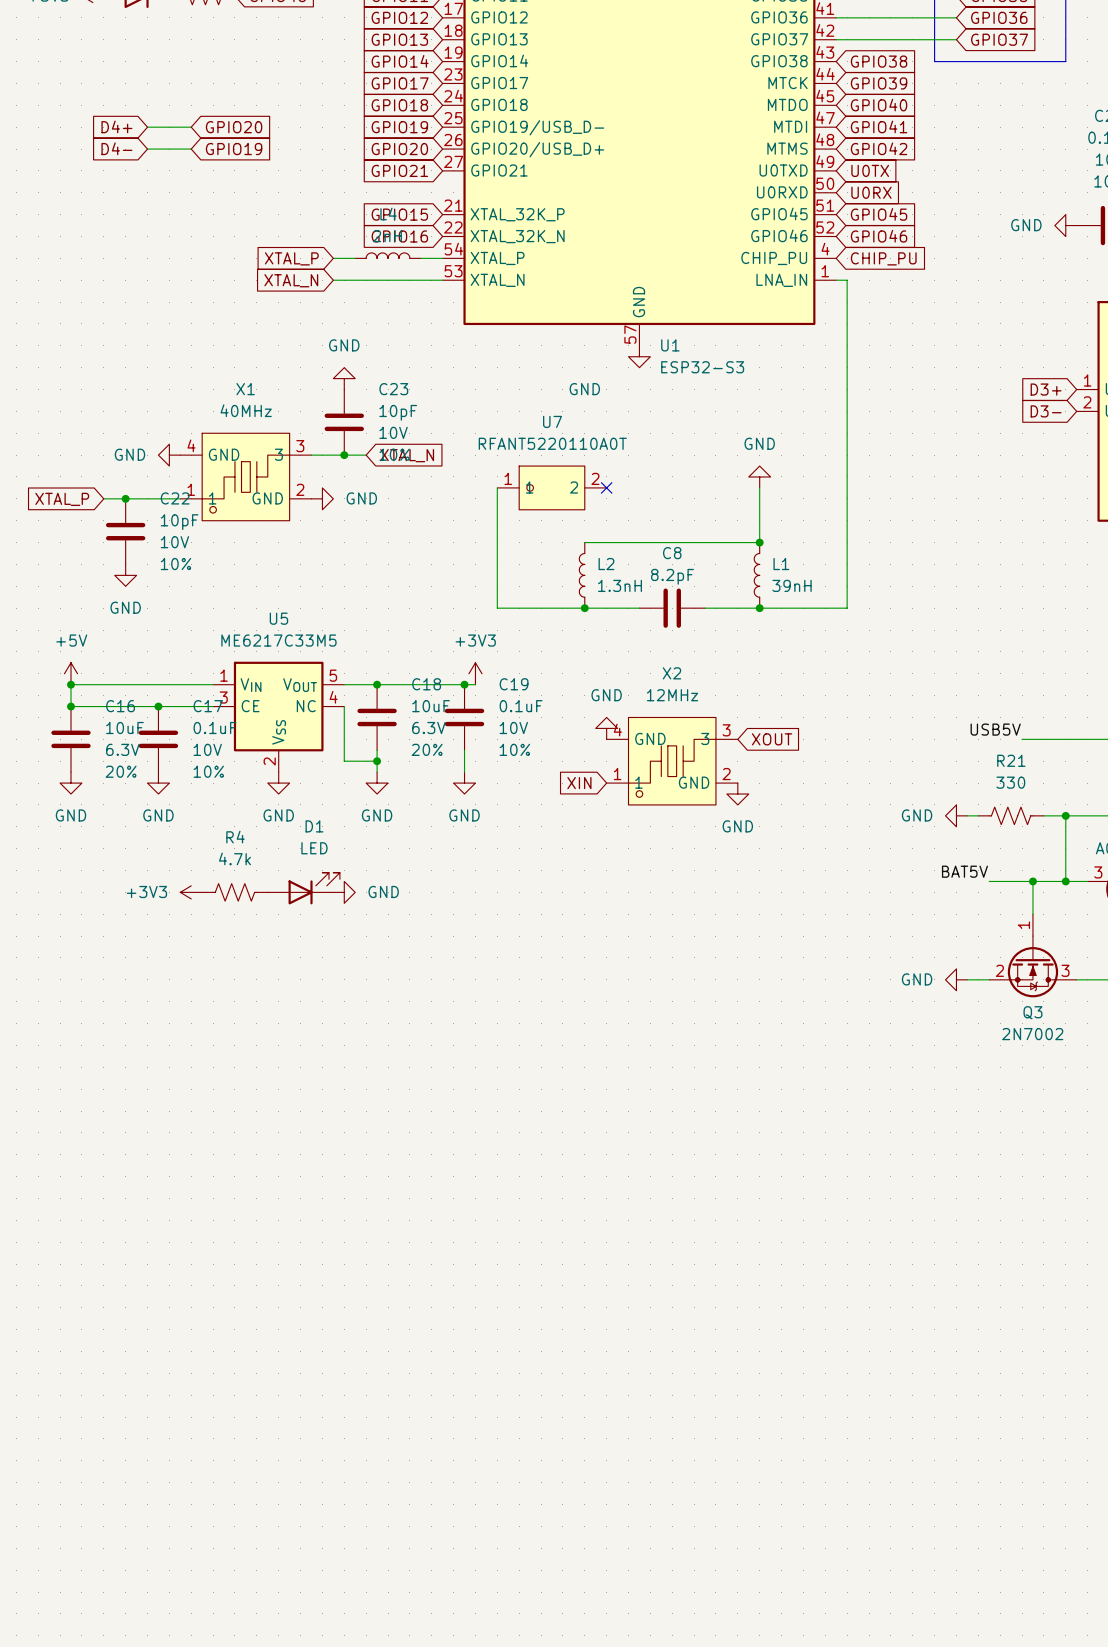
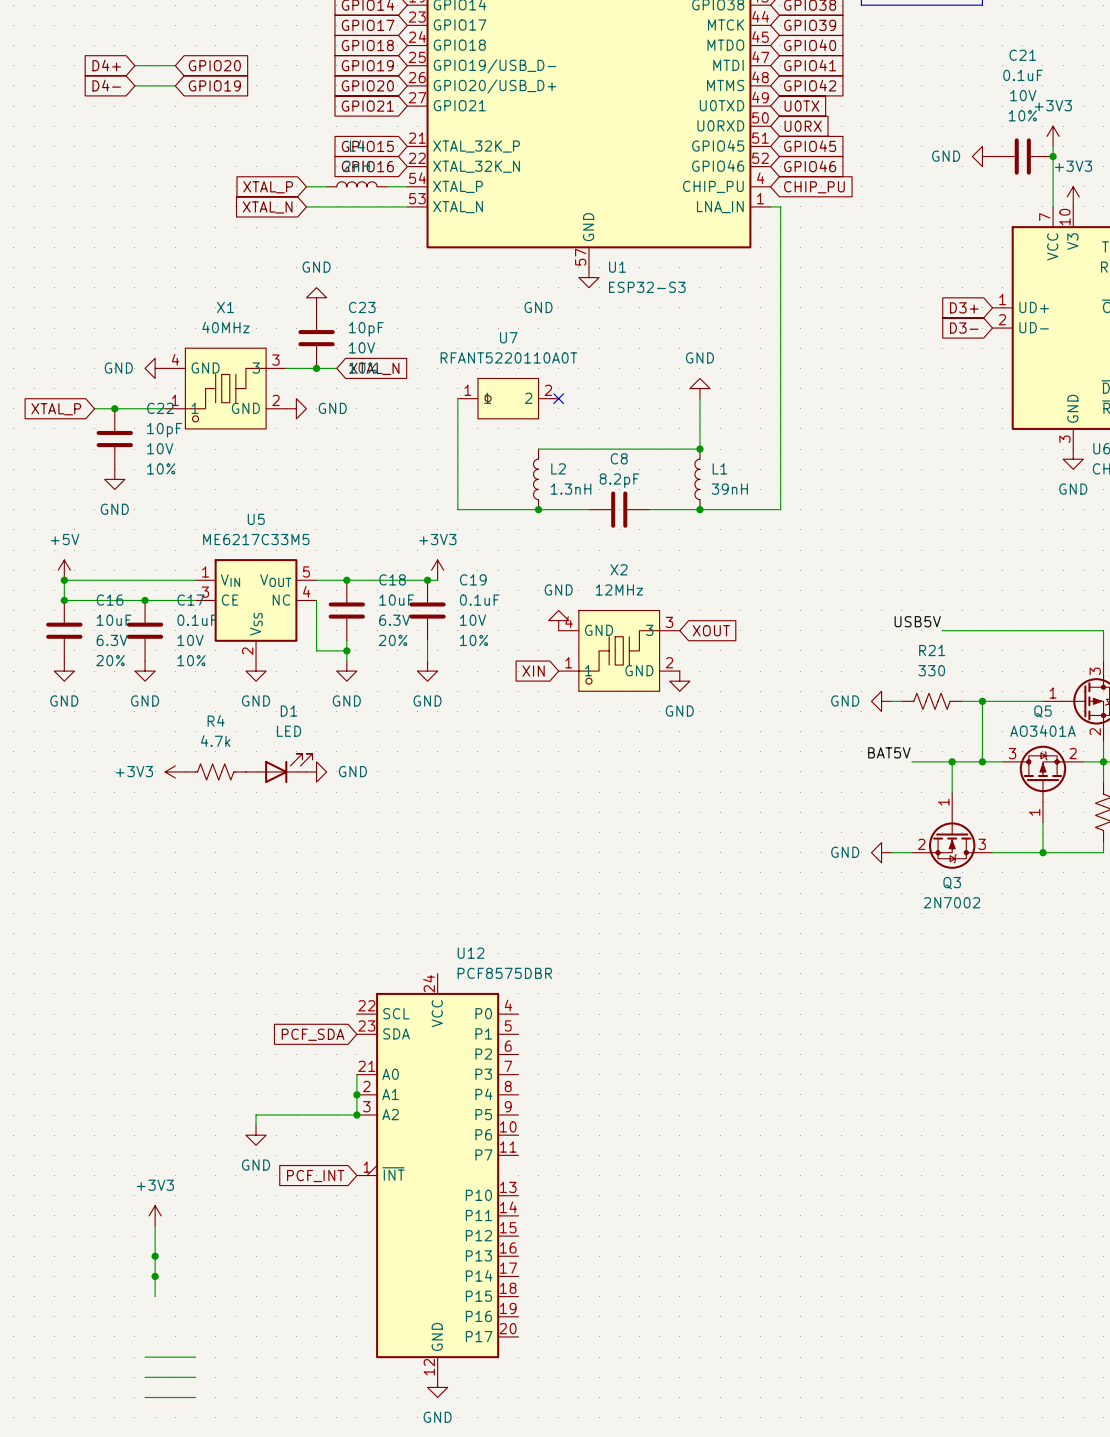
global label: none -> PCF_SDA (313, 1034)
wire: none -> (356, 1074) (356, 1115) (256, 1115) (256, 1125)
junction: none -> (356, 1094)
junction: none -> (356, 1115)
power symbol: none -> GND (256, 1135)
U12: none -> PCF8575DBR (437, 1175)
global label: none -> PCF_INT (315, 1176)
power symbol: none -> +3V3 (155, 1215)
wire: none -> (155, 1225) (155, 1296)
junction: none -> (155, 1256)
junction: none -> (155, 1276)
wire: none -> (145, 1357) (195, 1357)
wire: none -> (145, 1377) (195, 1377)
power symbol: none -> GND (437, 1387)
wire: none -> (145, 1397) (195, 1397)

